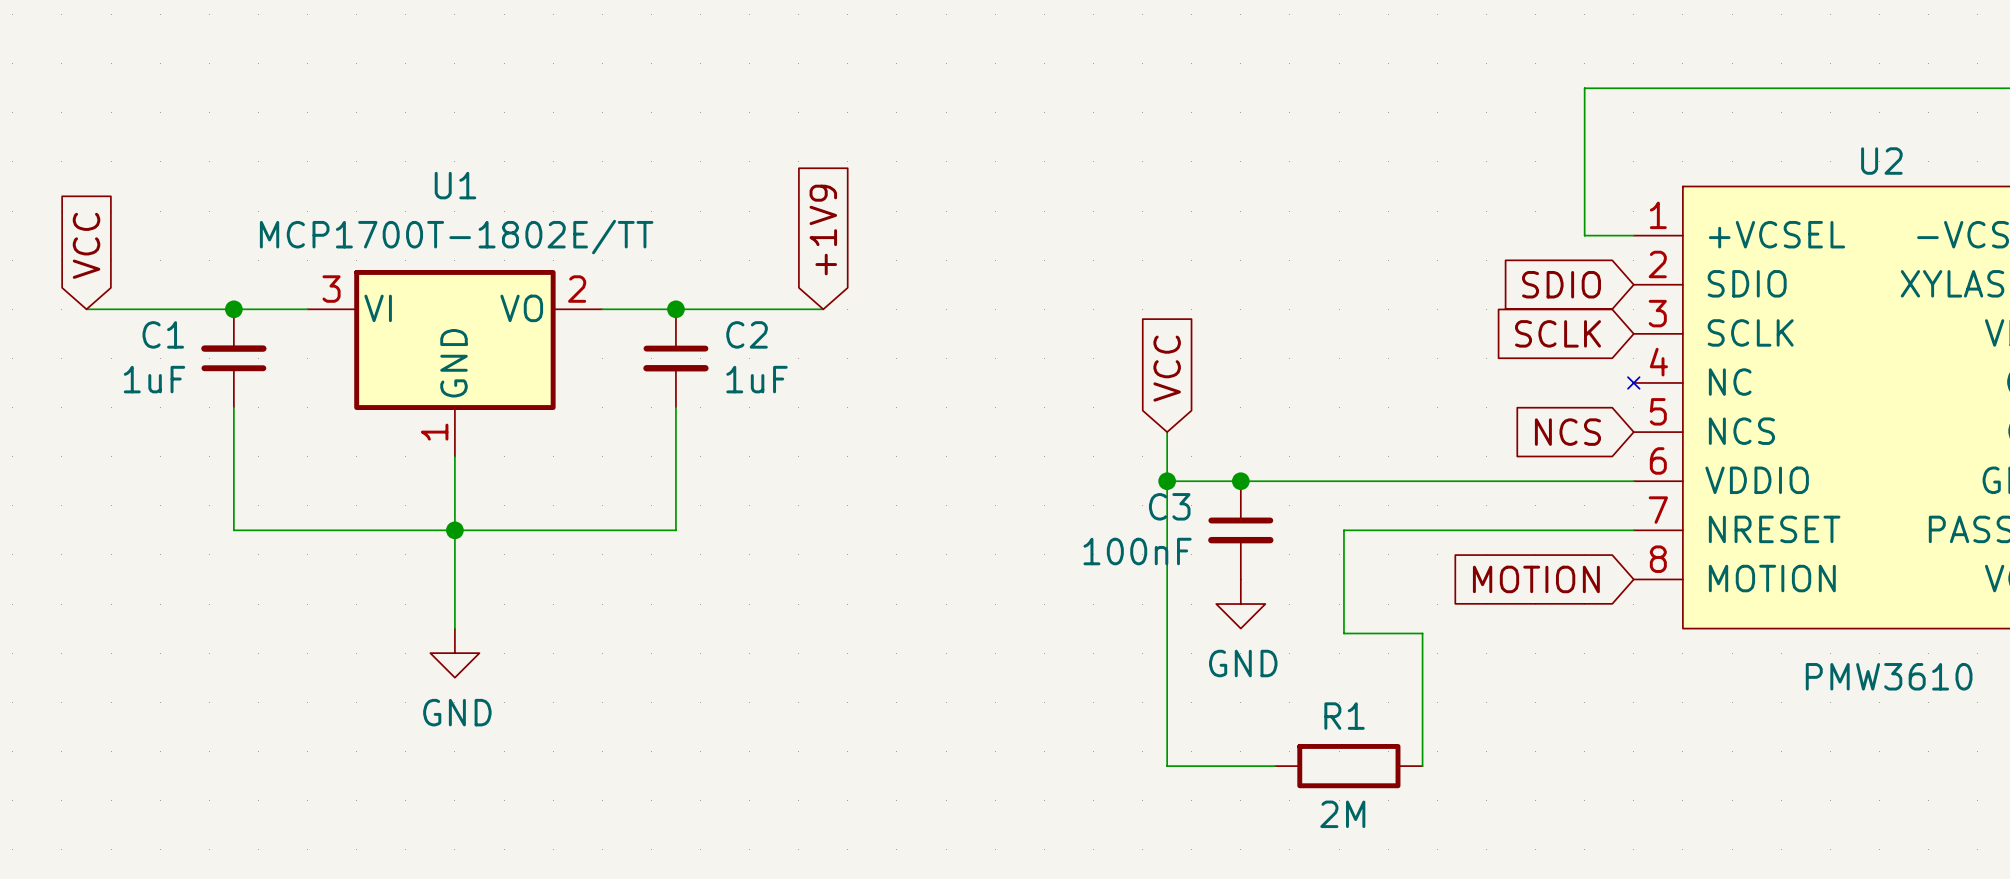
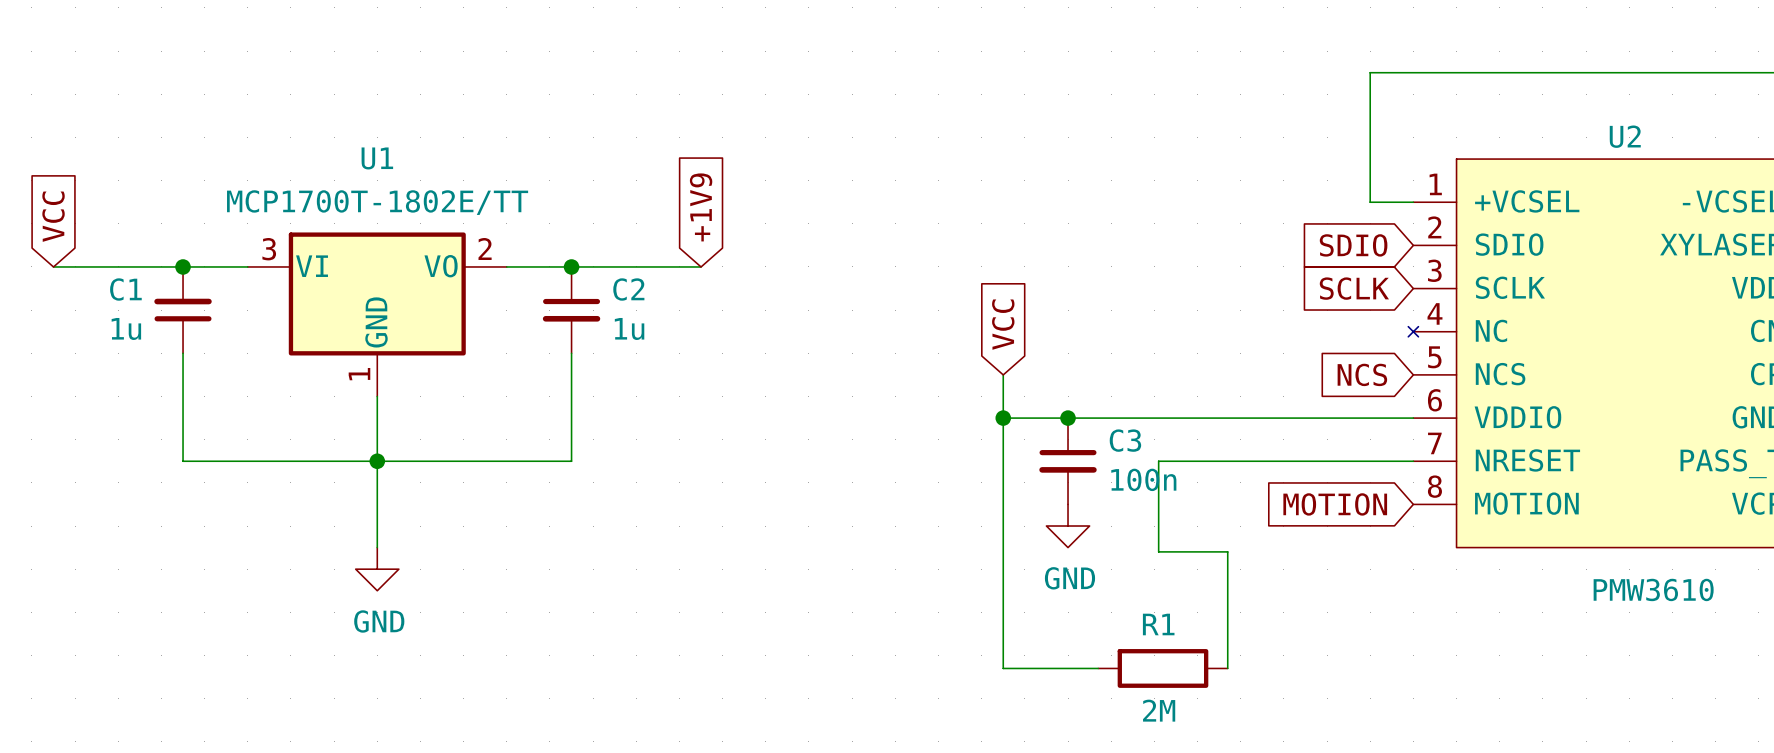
C1 value: 1uF (154, 379) -> 1u (126, 328)
C2 value: 1uF (756, 379) -> 1u (629, 328)
C3 name position: C3 (1169, 506) -> C3 (1125, 440)
C3 value: 100nF (1137, 551) -> 100n (1143, 479)

